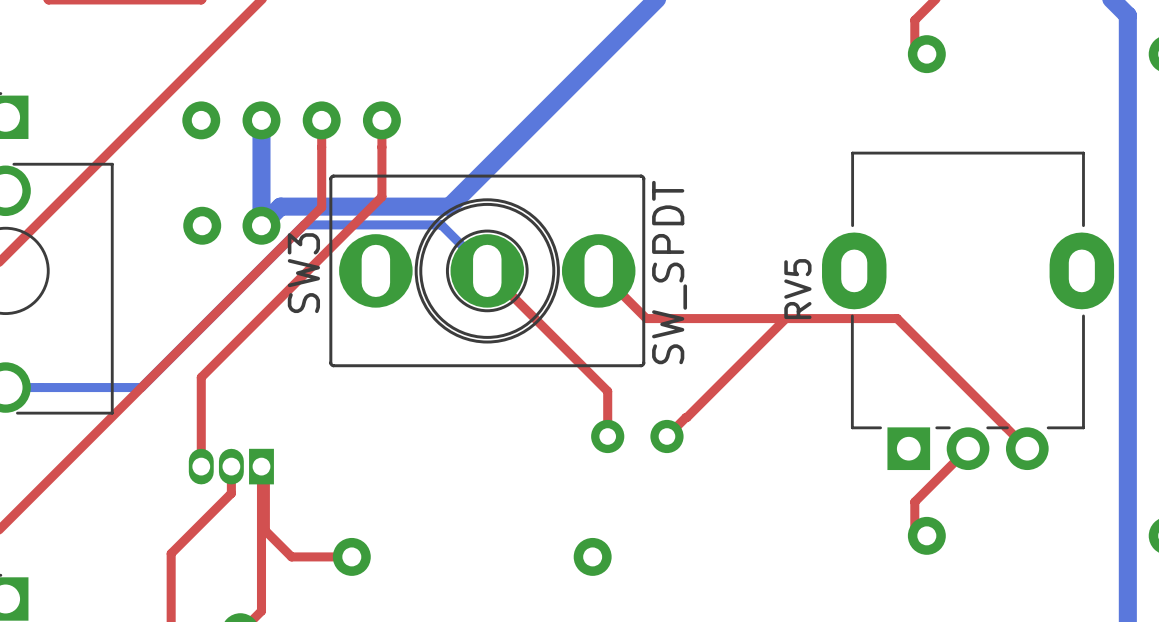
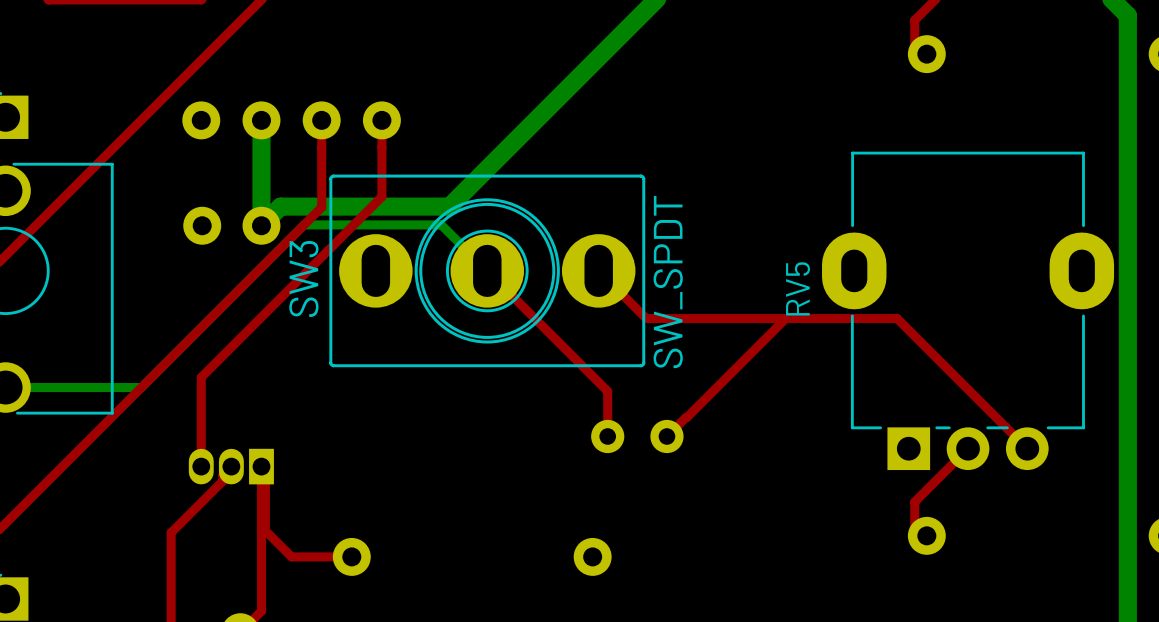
top track: (231, 466) (231, 493) (171, 553) -> (231, 466) (222, 475) (222, 480) (171, 532) (171, 553)

